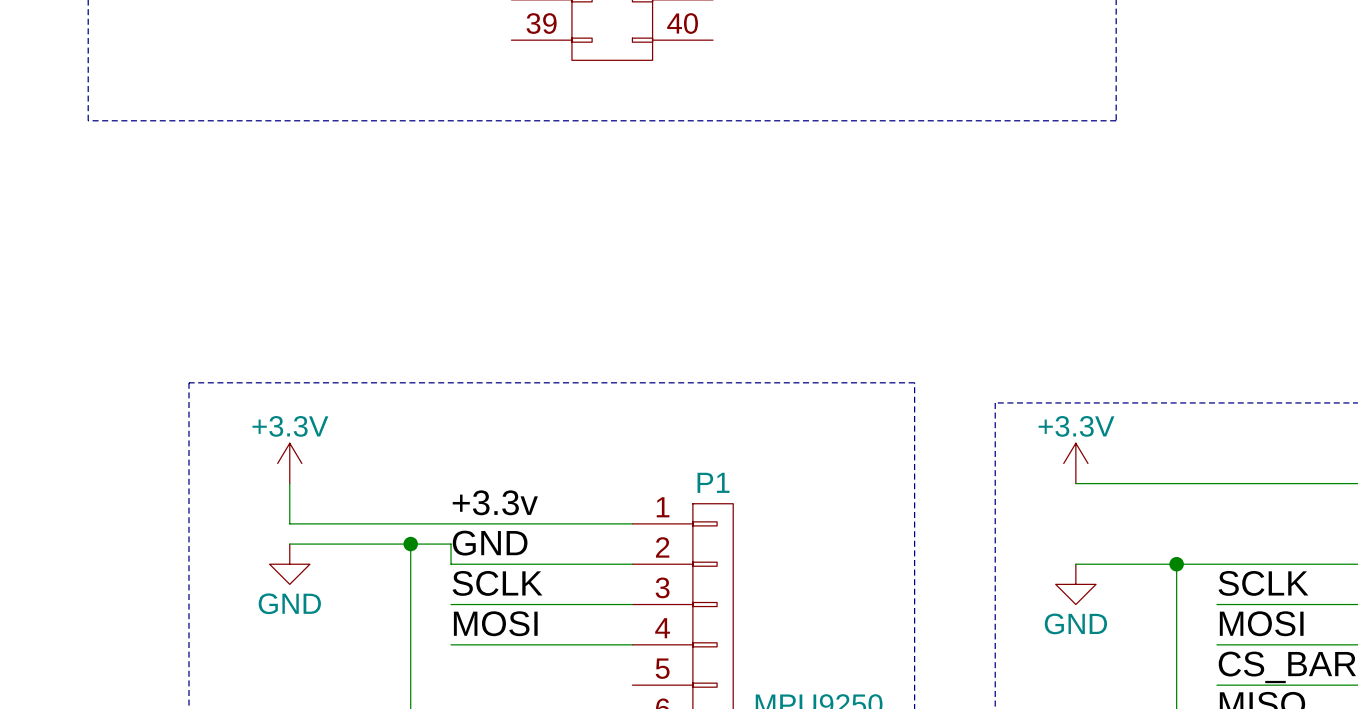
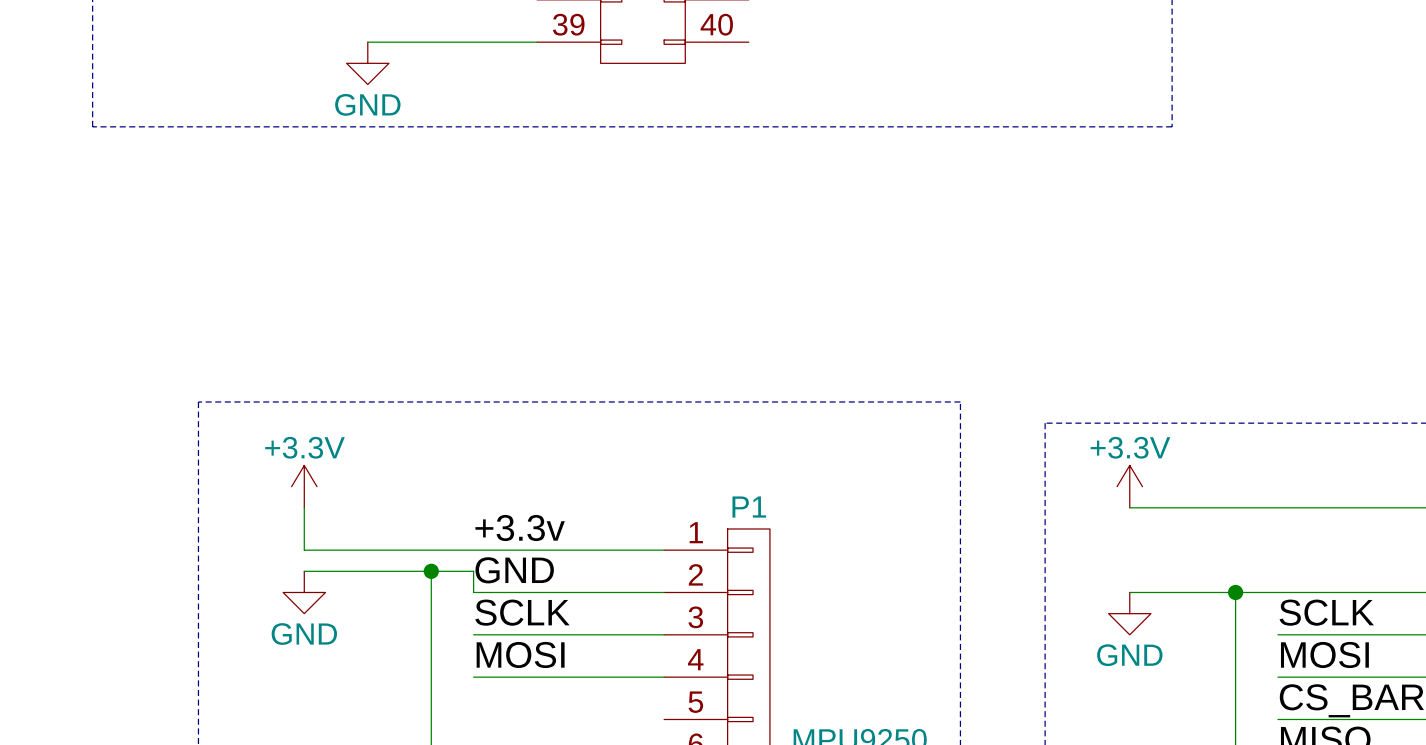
wire: none -> (367, 42) (537, 42)
power symbol: none -> GND (367, 63)

